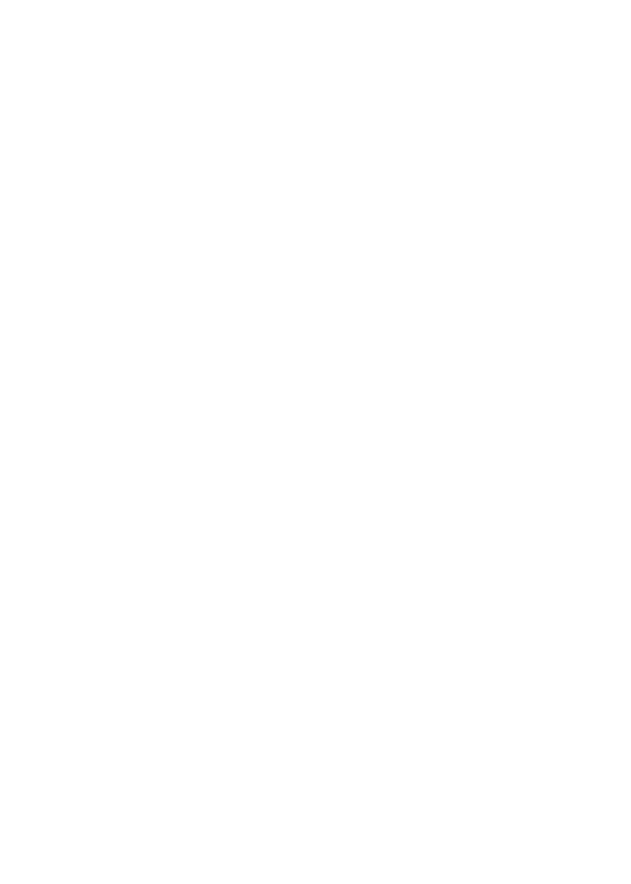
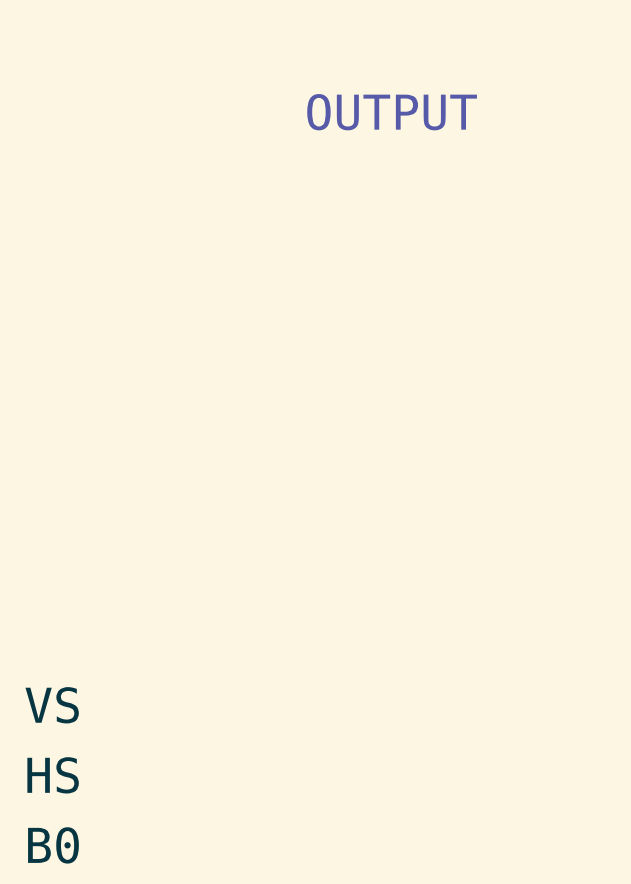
text: none -> OUTPUT (392, 112)
label: none -> VS (52, 705)
label: none -> HS (53, 775)
label: none -> B0 (53, 845)

